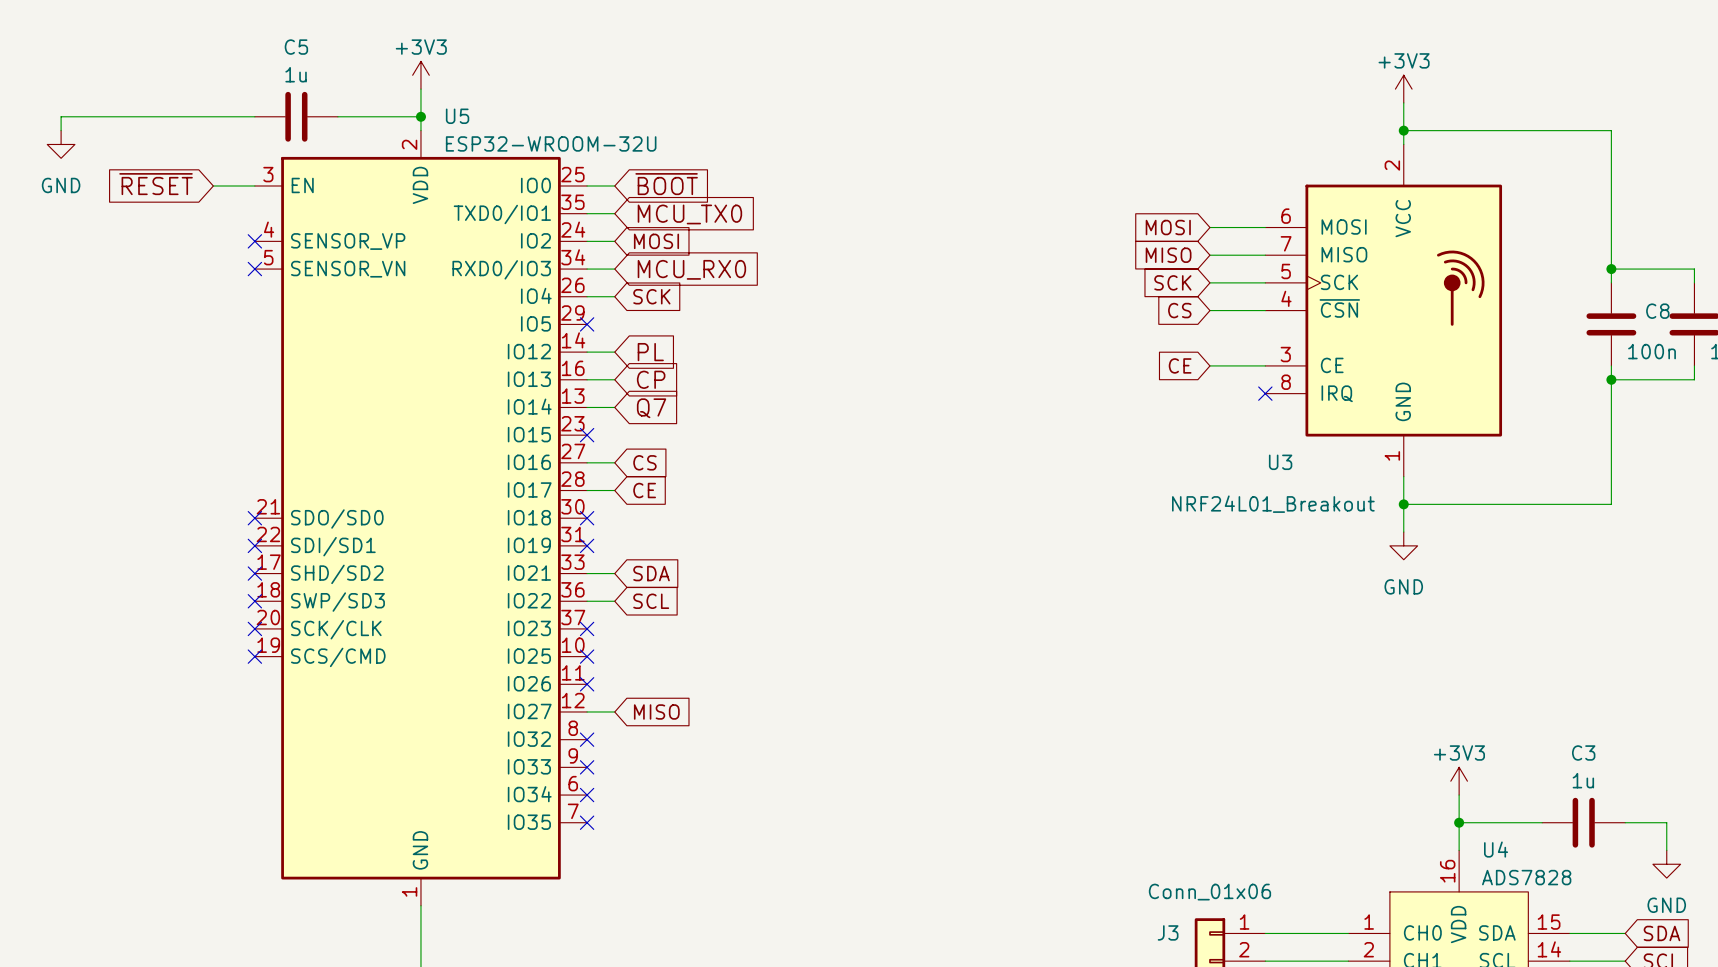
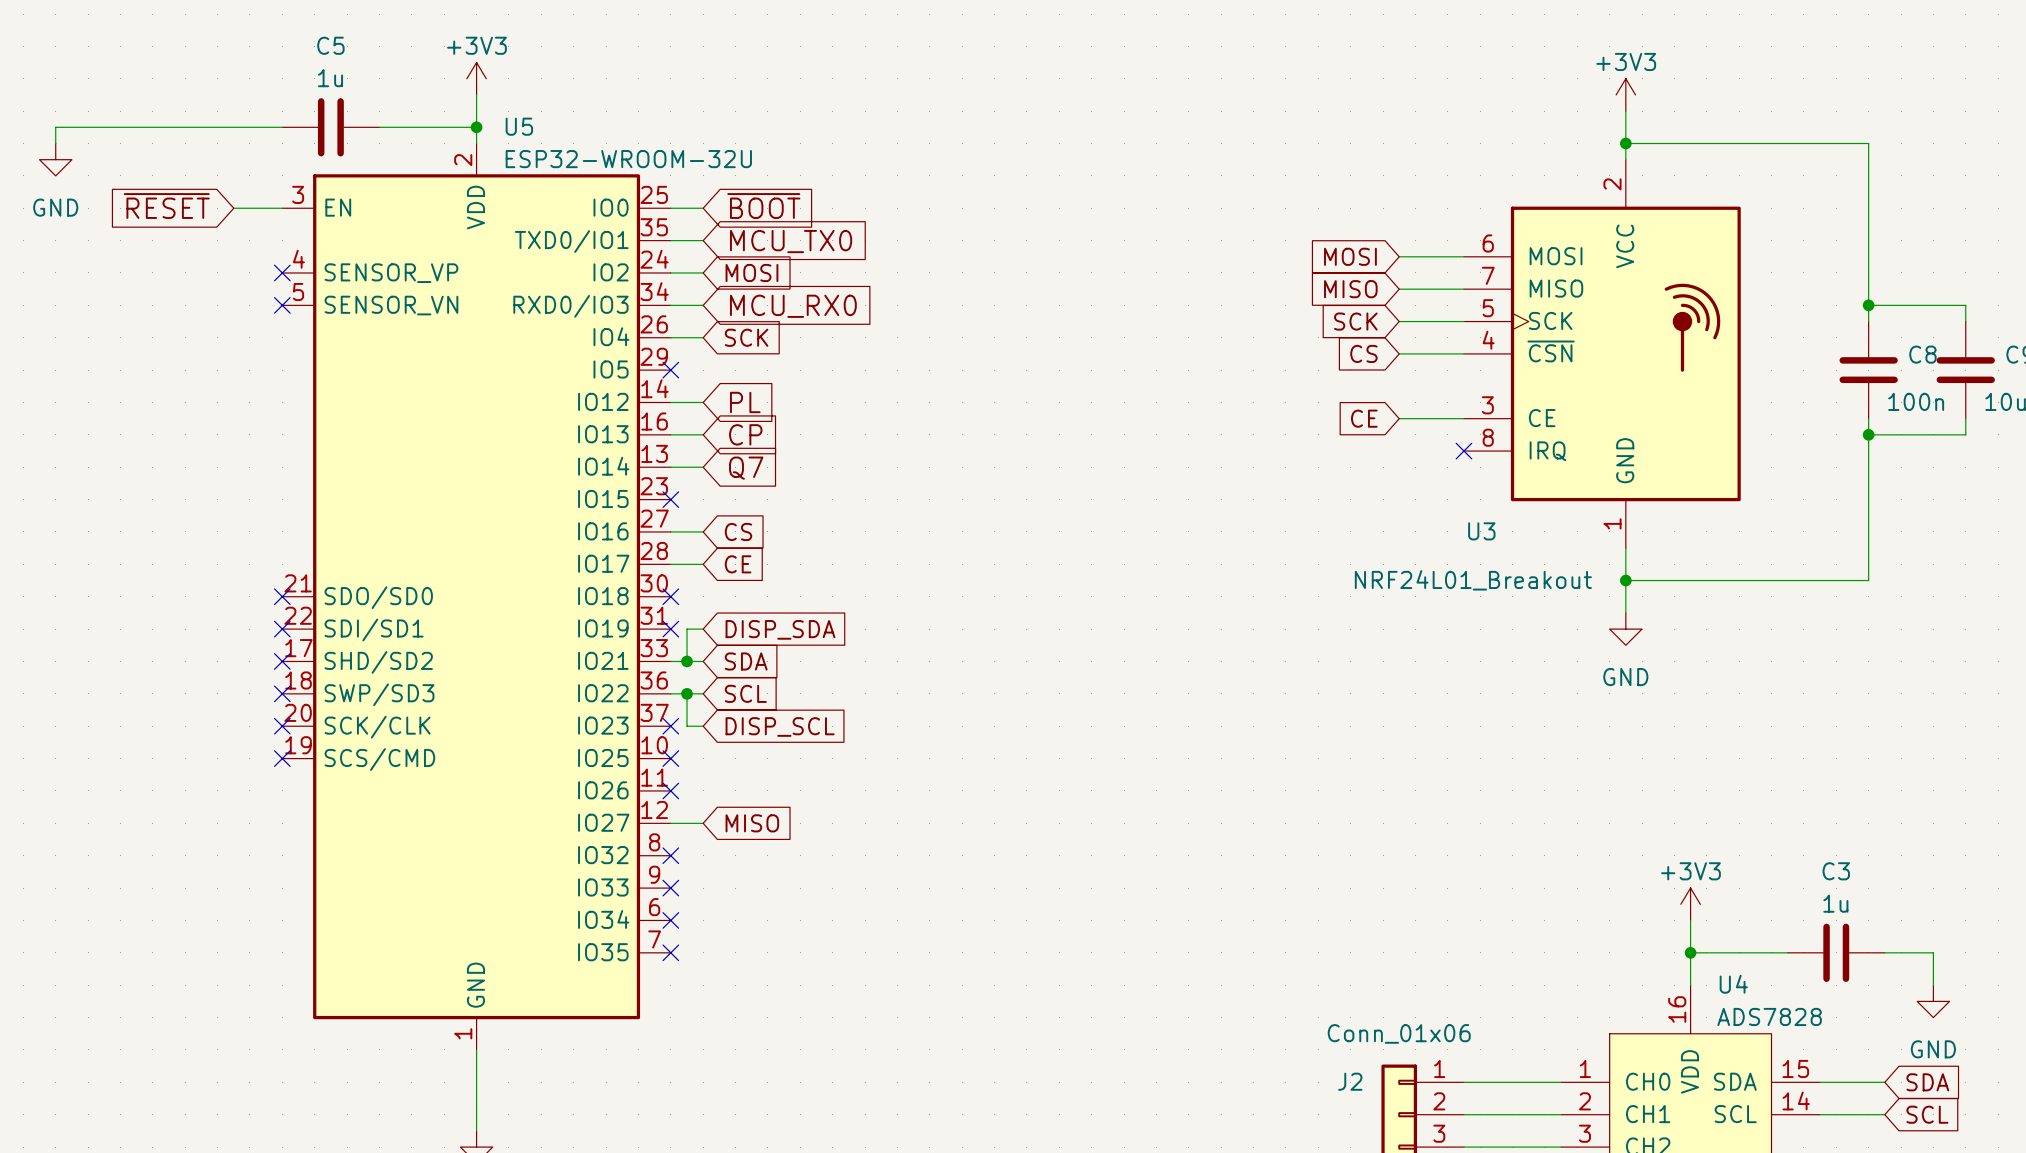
wire: none -> (703, 629) (687, 629) (687, 661)
global label: none -> DISP_SDA (780, 629)
junction: none -> (687, 661)
wire: none -> (687, 693) (687, 726) (703, 726)
junction: none -> (687, 693)
global label: none -> DISP_SCL (780, 726)
J3 name: J3 (1168, 932) -> J2 (1350, 1081)

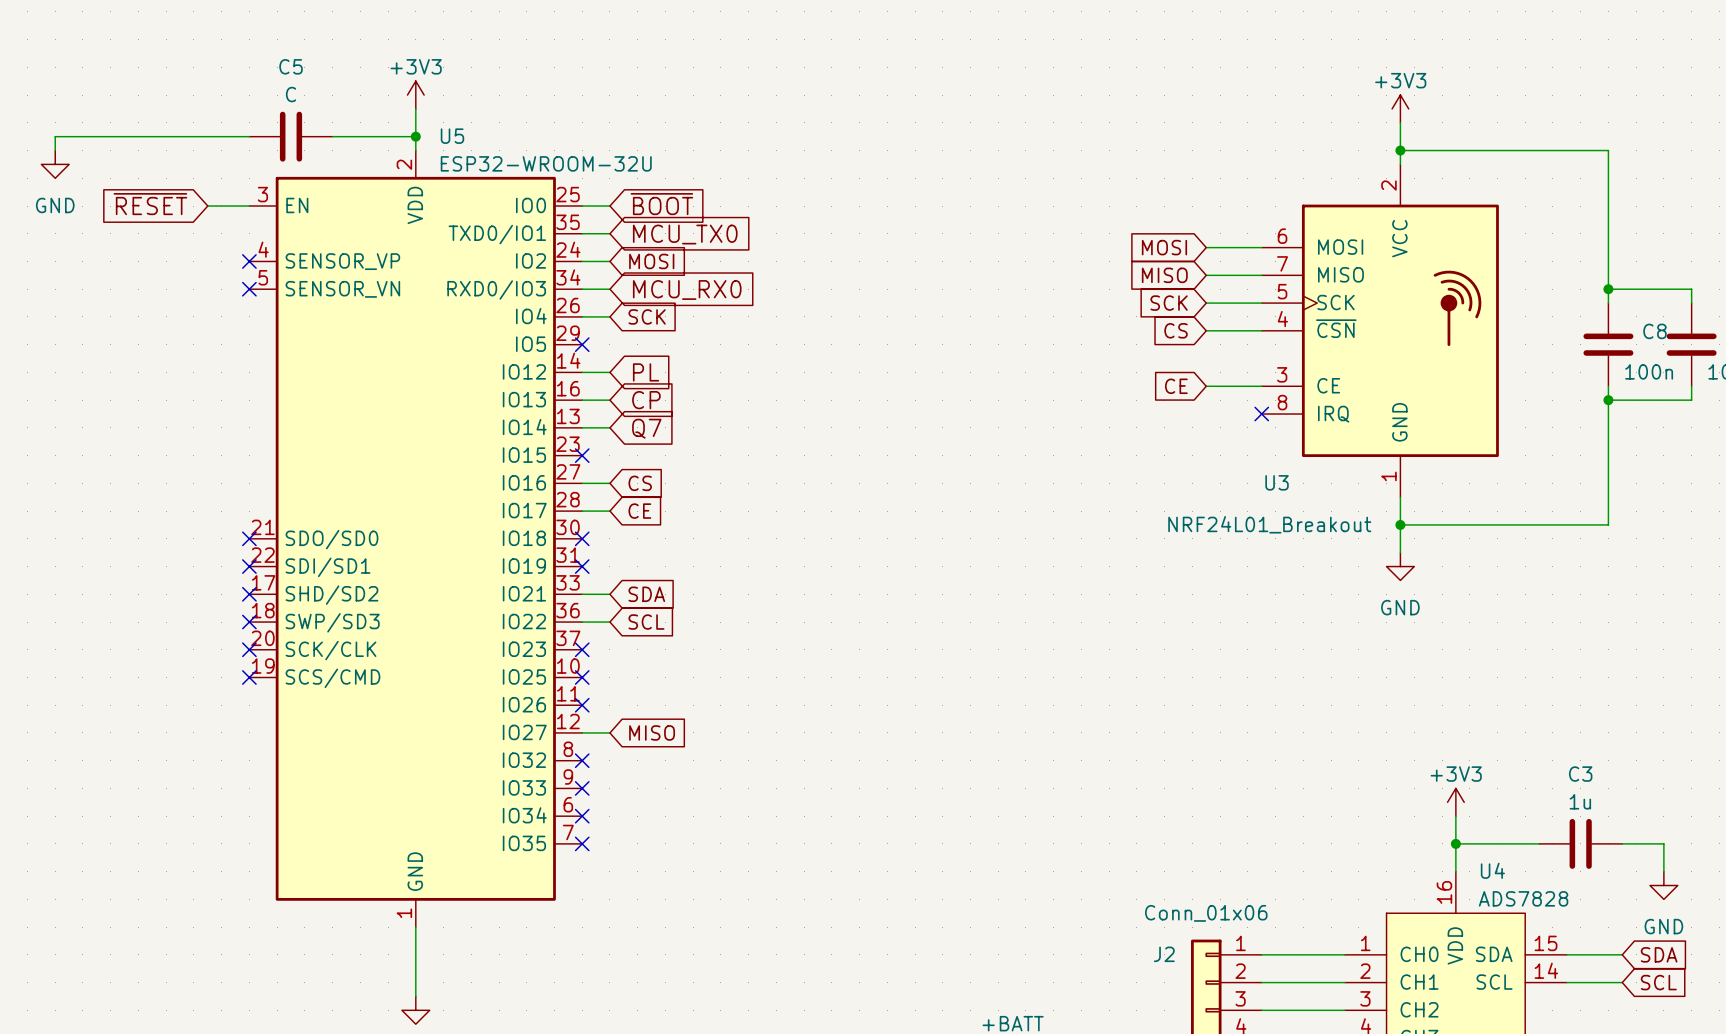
C5 value: 1u (330, 78) -> C (291, 94)
wire: (703, 629) (687, 629) (687, 661) -> none
global label: DISP_SDA (780, 629) -> none
junction: (687, 661) -> none
wire: (687, 693) (687, 726) (703, 726) -> none
junction: (687, 693) -> none
global label: DISP_SCL (780, 726) -> none

